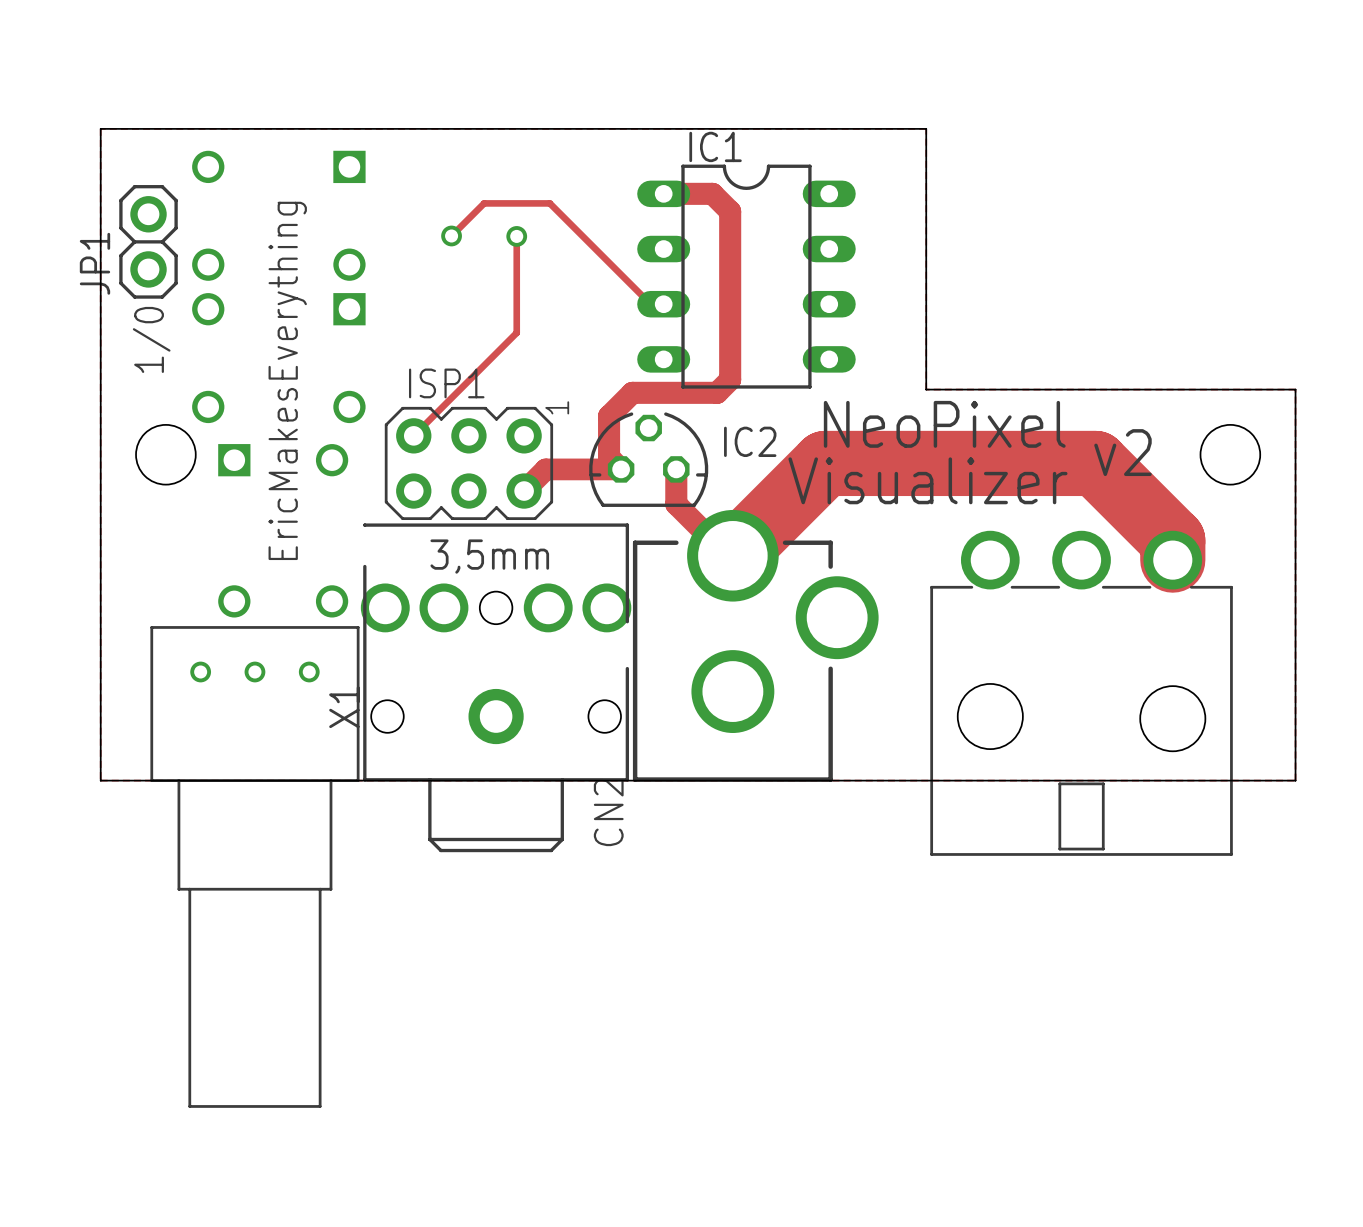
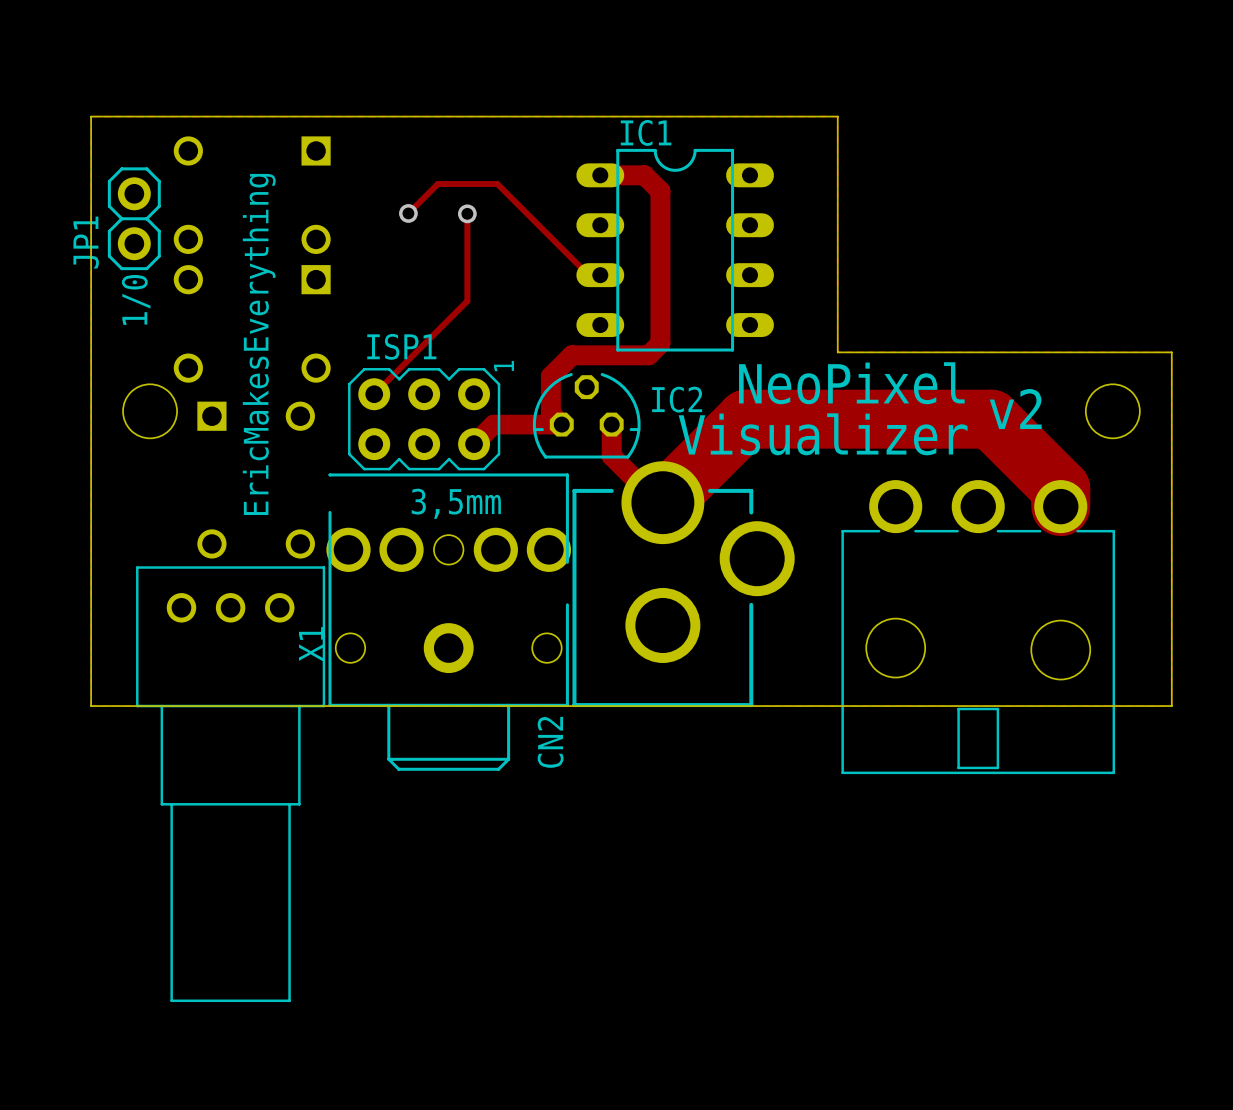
part footprint: [150, 626, 360, 1108] -> [136, 566, 326, 1003]

